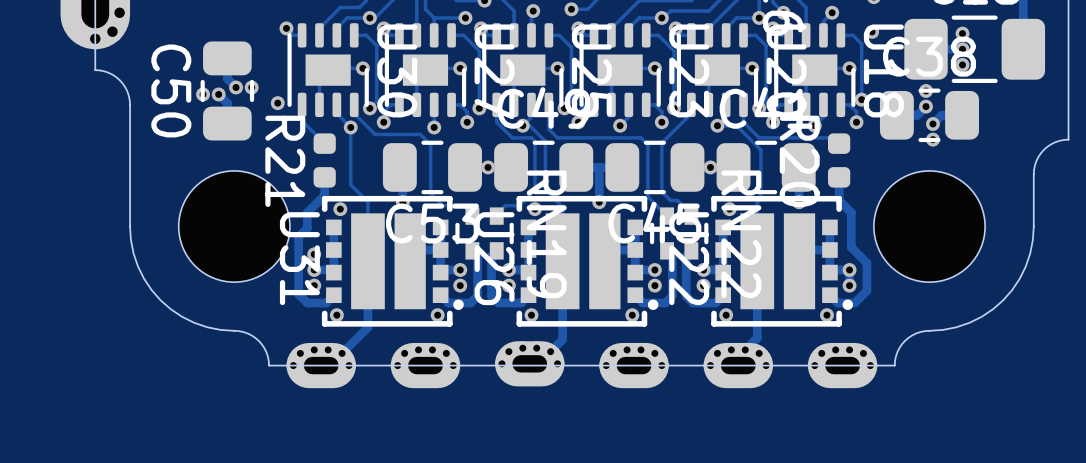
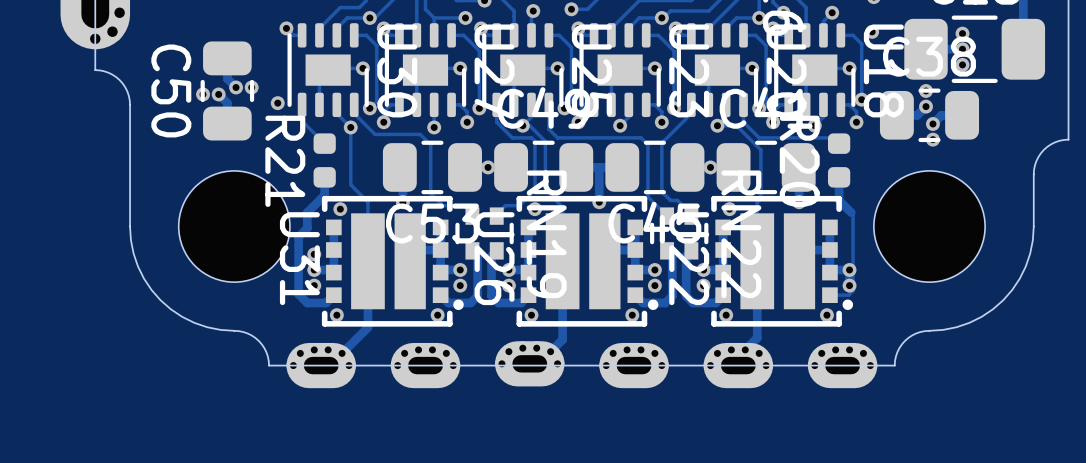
track: (851, 212) (851, 247) (866, 263) (866, 290) (854, 303) (837, 303) (829, 295) -> (851, 212) (853, 214) (853, 290) (848, 295) (829, 295)

